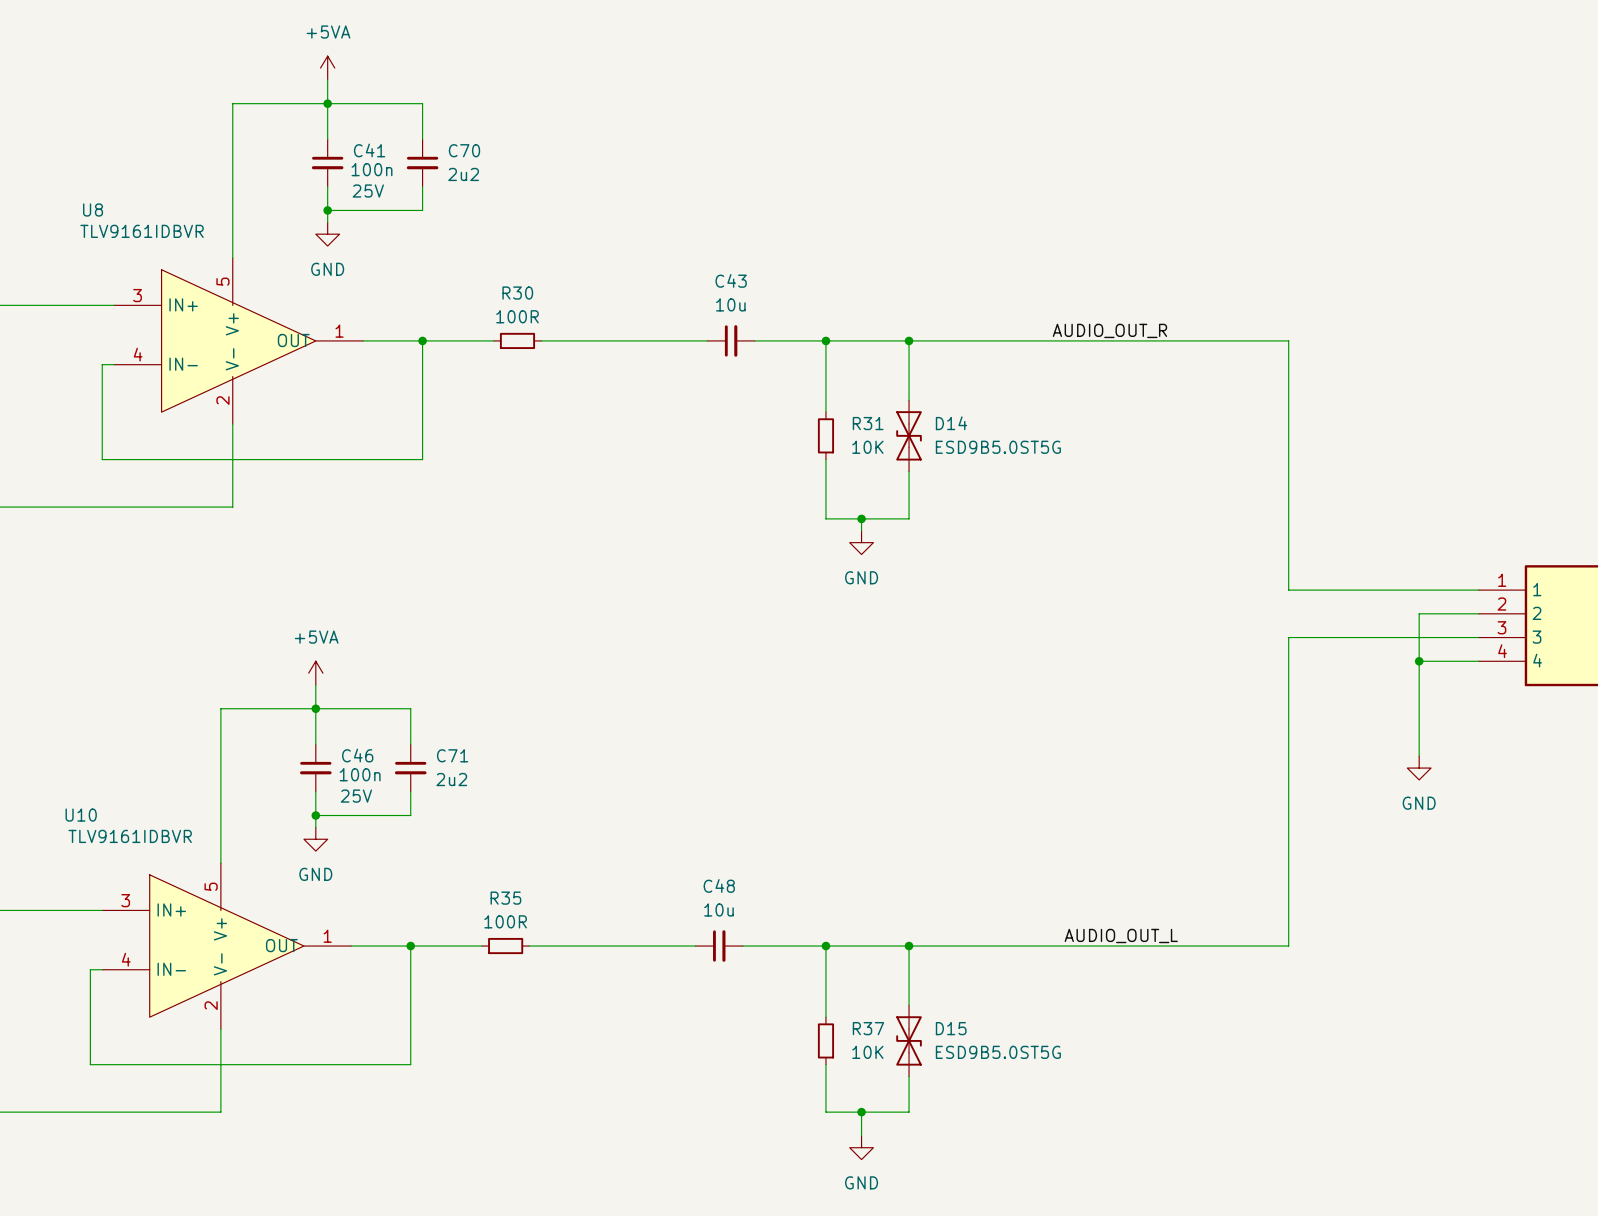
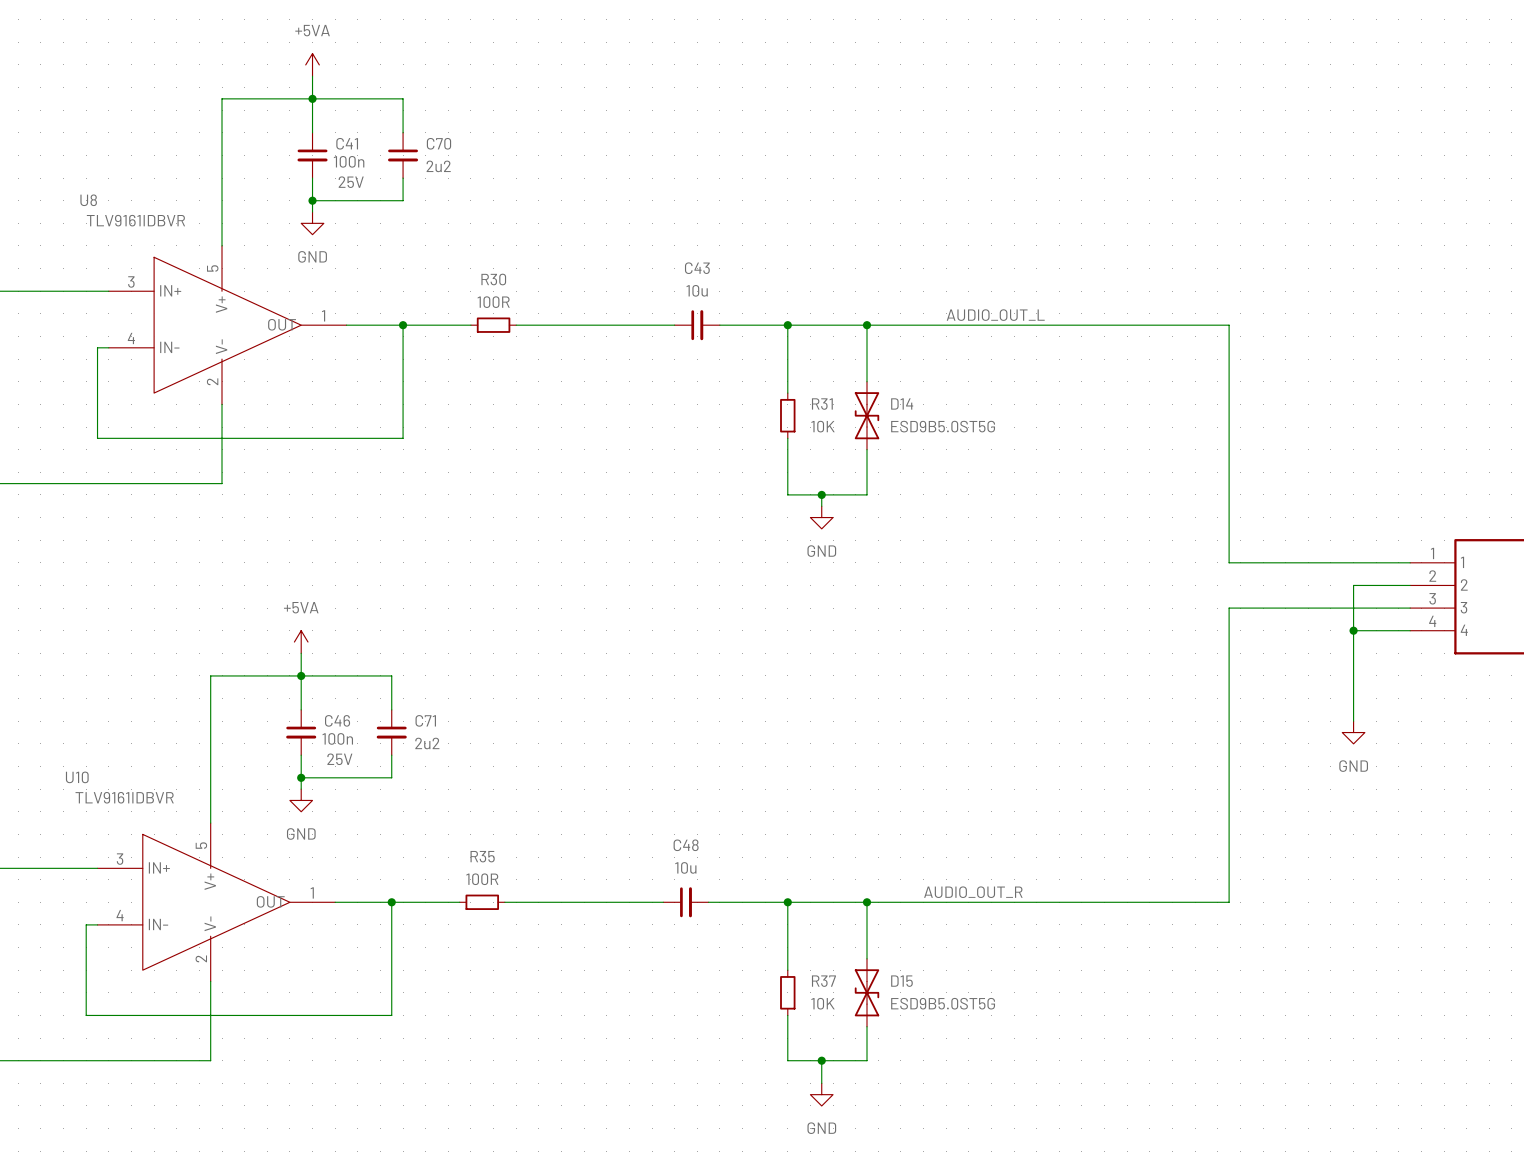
label: AUDIO_OUT_R (1109, 330) -> AUDIO_OUT_L (995, 315)
label: AUDIO_OUT_L (1121, 936) -> AUDIO_OUT_R (973, 892)

